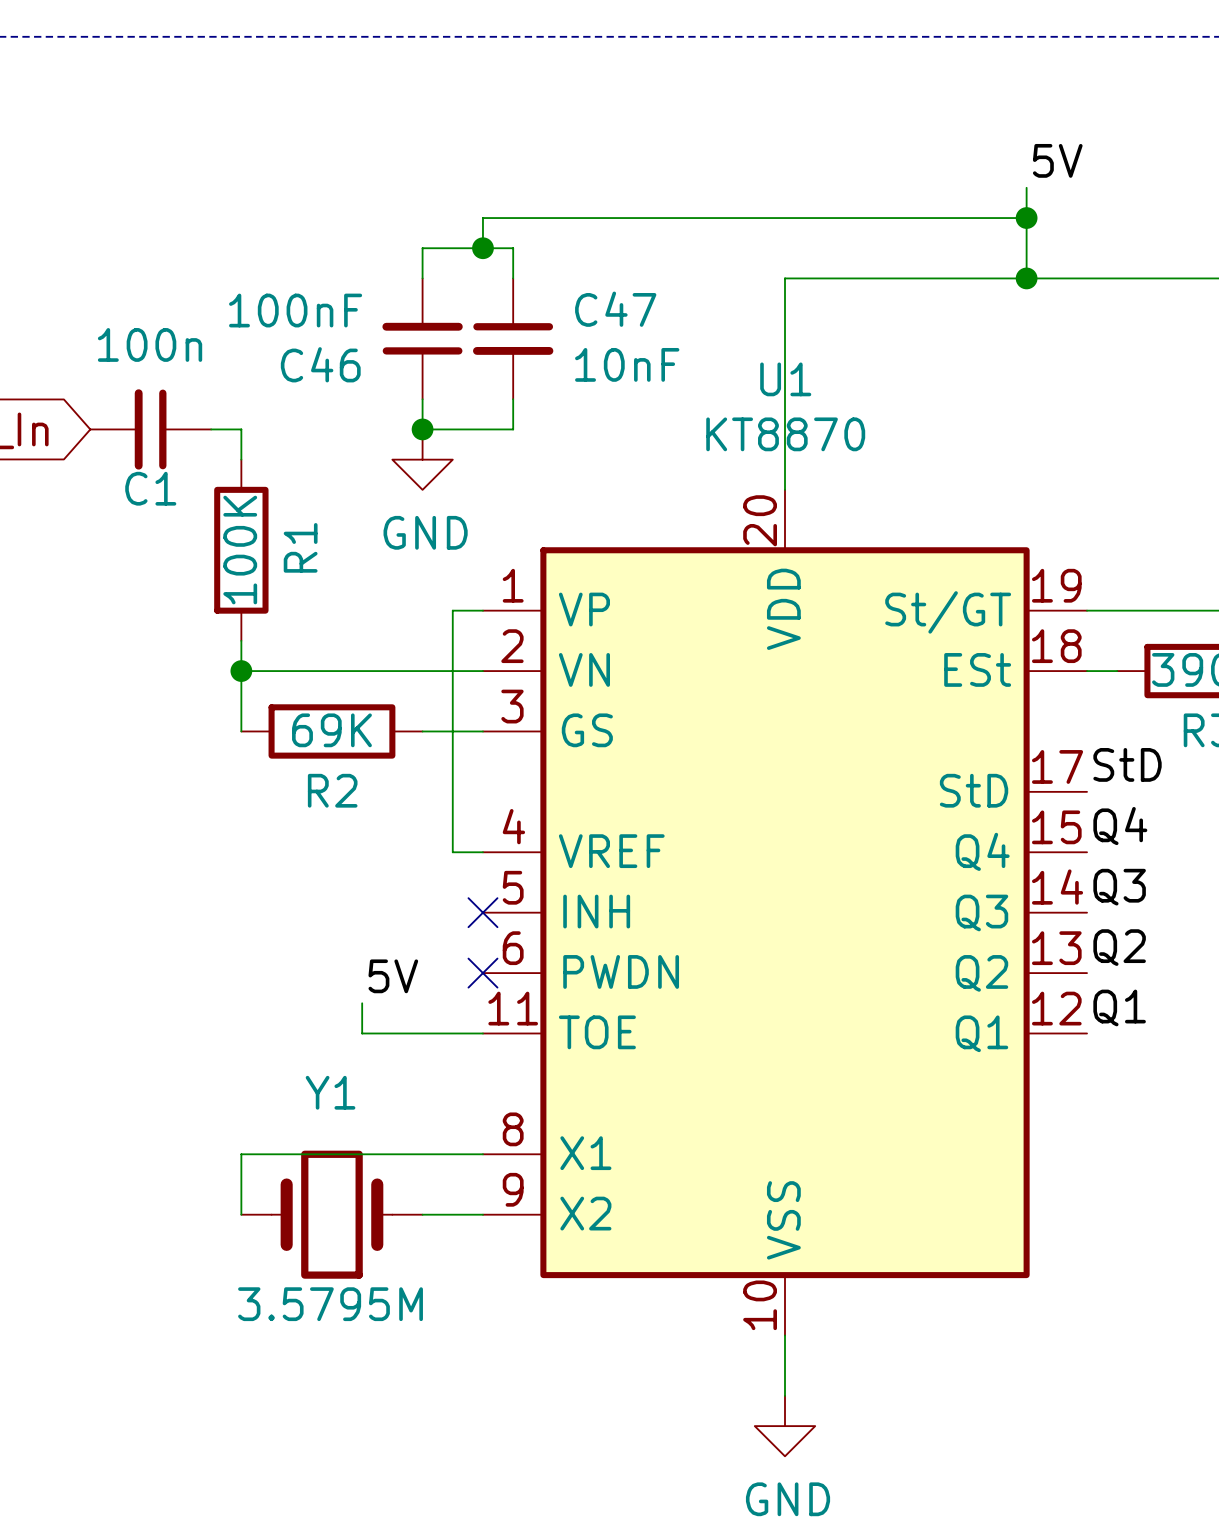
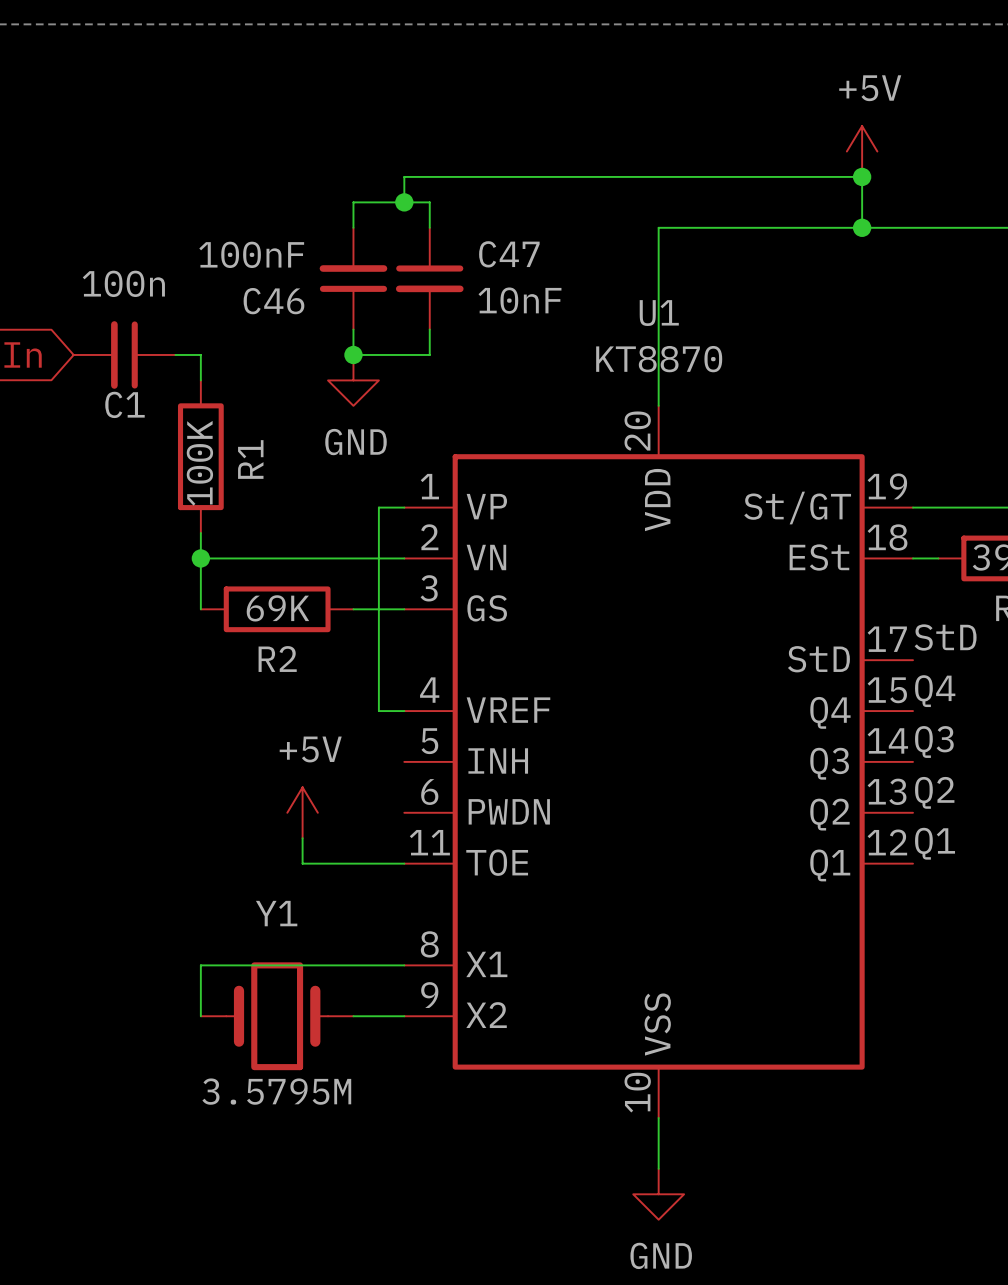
label: 5V (1057, 160) -> none
power symbol: none -> +5V (862, 151)
no-connect mark: (482, 912) -> none
power symbol: none -> +5V (302, 812)
no-connect mark: (482, 973) -> none
label: 5V (393, 976) -> none

